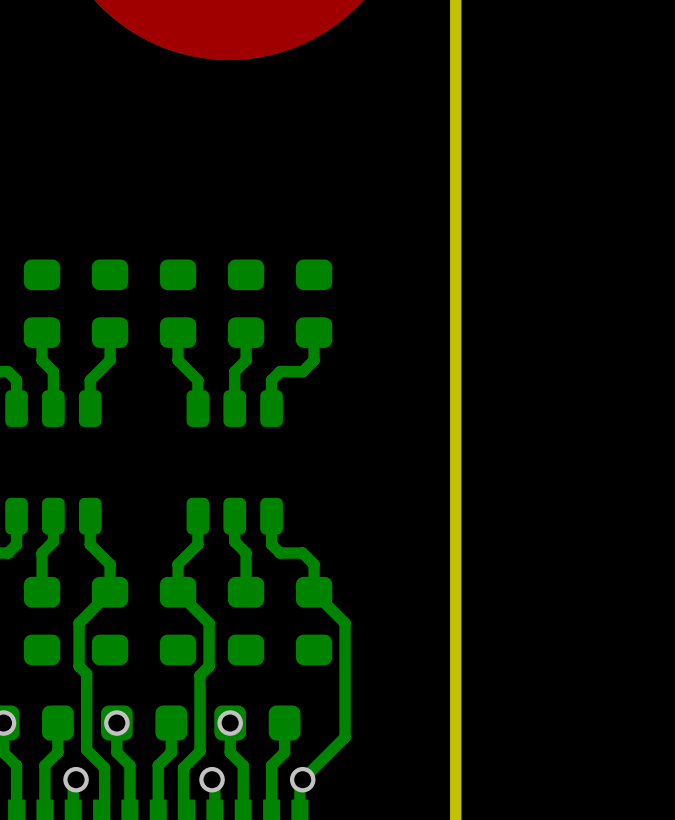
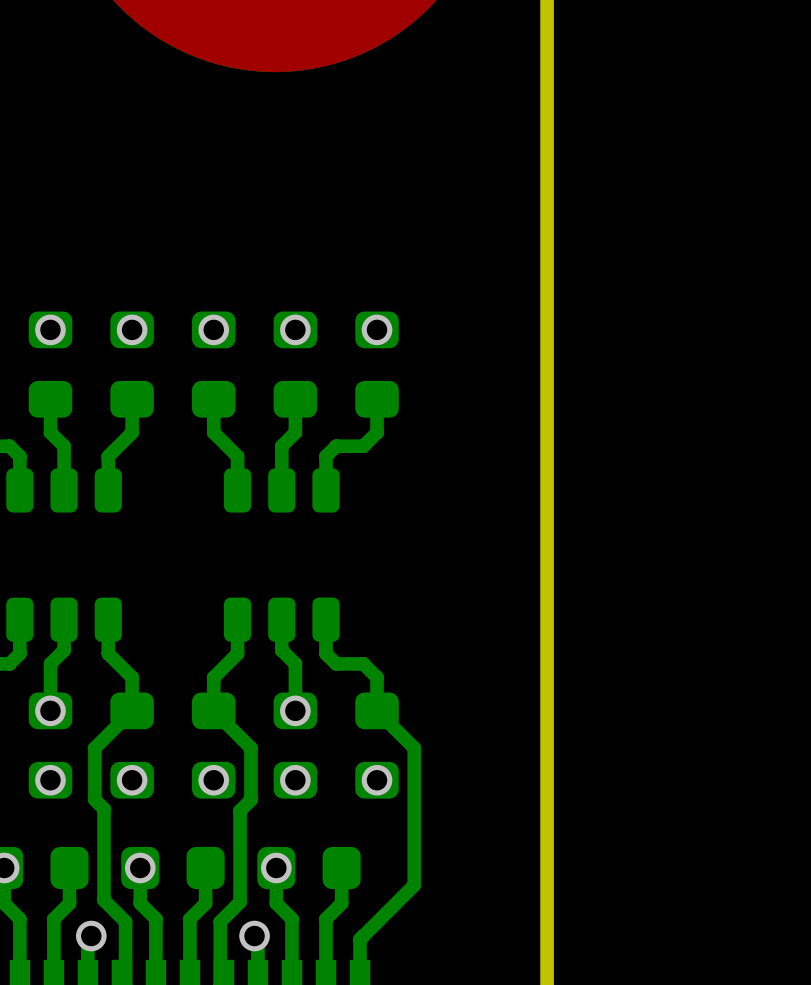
via: none -> (50, 329)
via: none -> (132, 329)
via: none -> (213, 329)
via: none -> (295, 329)
via: none -> (377, 329)
via: none -> (50, 710)
via: none -> (295, 710)
via: none -> (50, 780)
via: none -> (132, 780)
via: none -> (213, 780)
via: none -> (295, 780)
via: none -> (377, 780)
via: (302, 779) -> none

